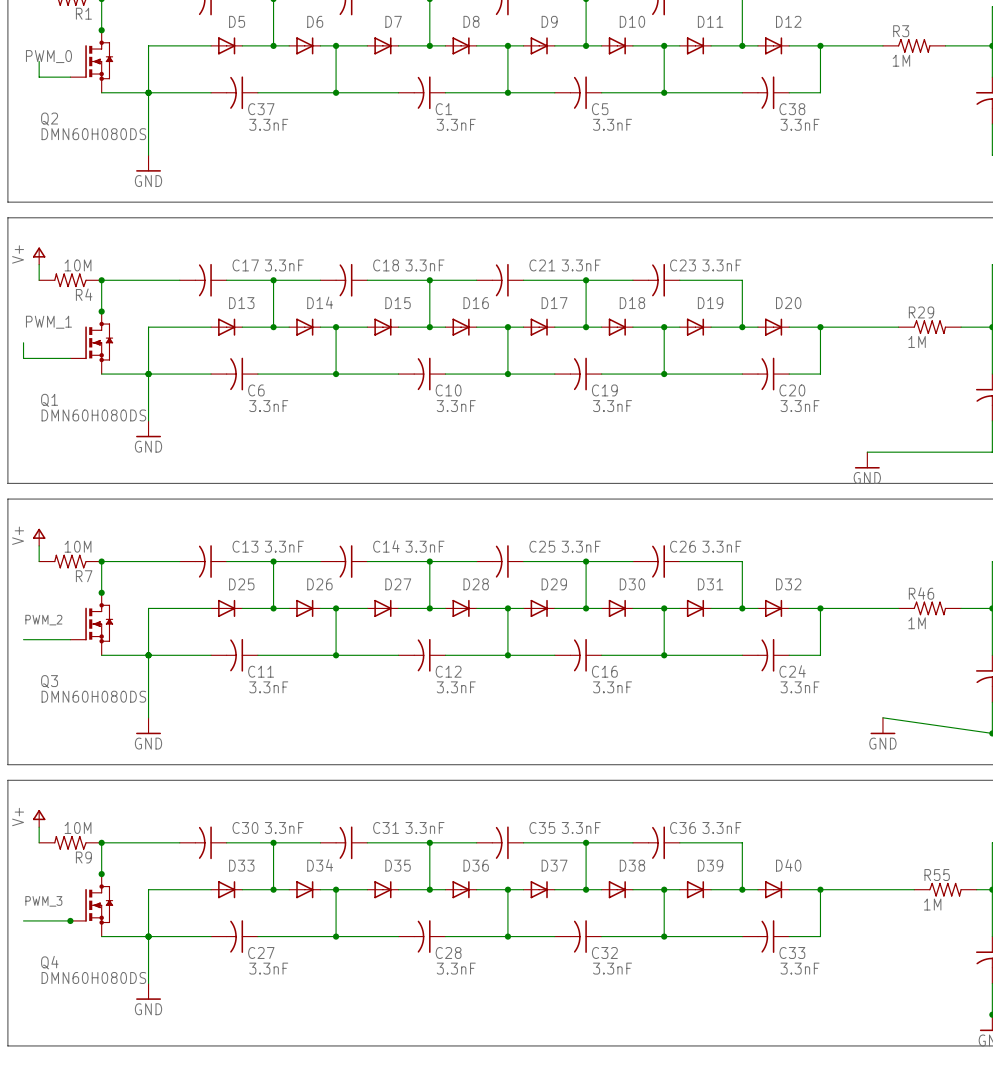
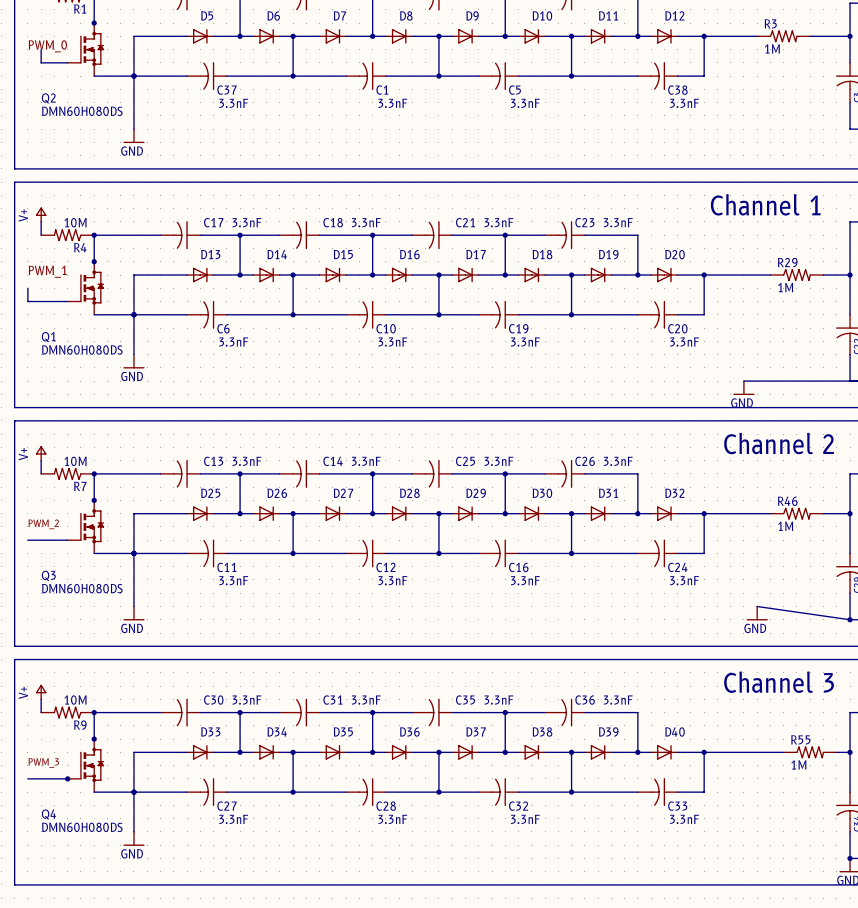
text: none -> Channel 1 (765, 204)
text: none -> Channel 2 (779, 443)
text: none -> Channel 3 (779, 682)

